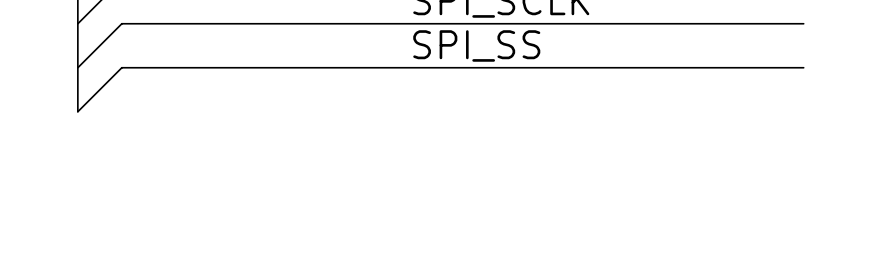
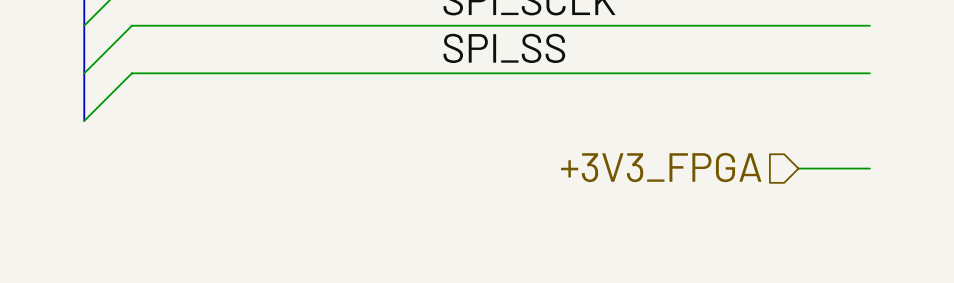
hierarchical label: none -> +3V3_FPGA (661, 167)
wire: none -> (798, 168) (869, 168)

